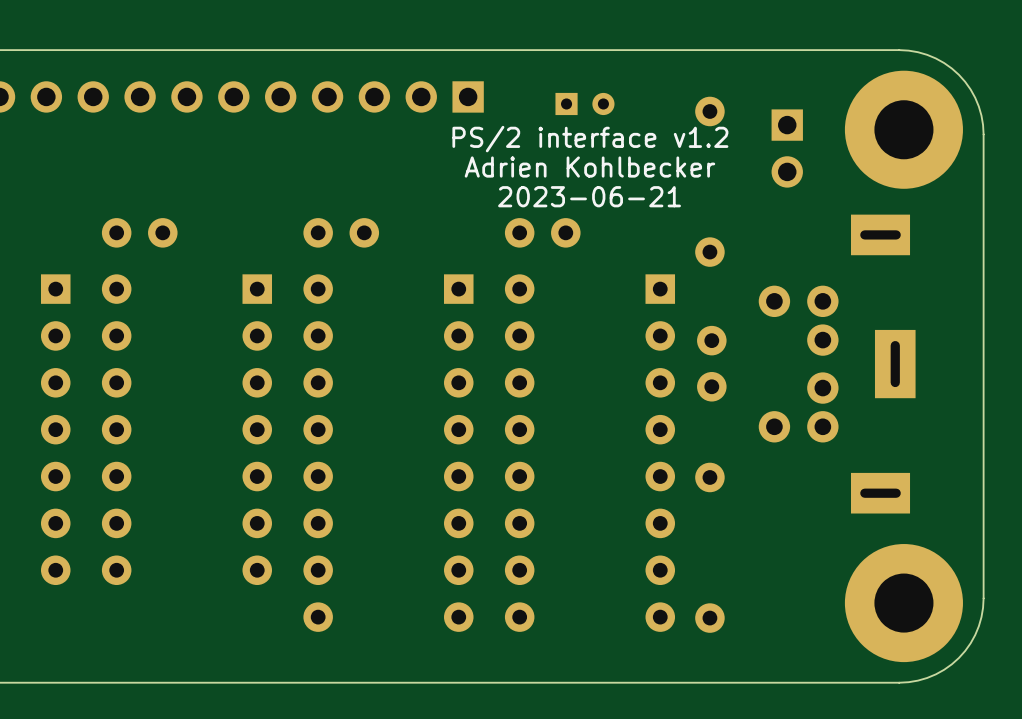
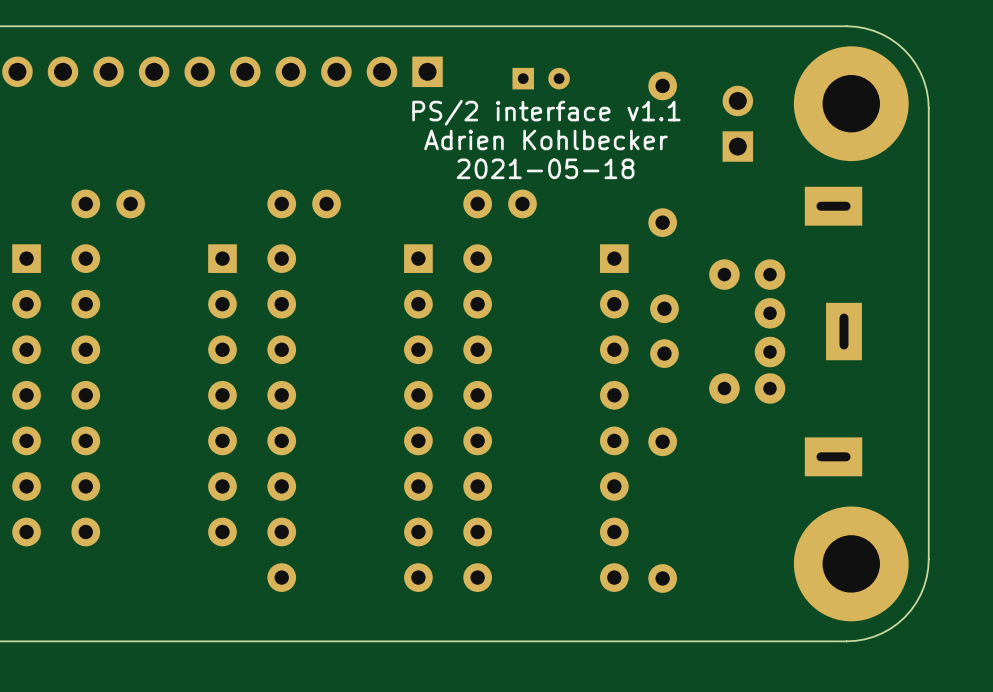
text: PS/2 interface v1.2 (590, 139) -> PS/2 interface v1.1 (546, 112)
part rotation: 0° (787, 148) -> 180° (737, 123)
text: 2023-06-21 (589, 196) -> 2021-05-18 (545, 168)
part footprint: [758, 214, 916, 514] -> [709, 186, 863, 477]

